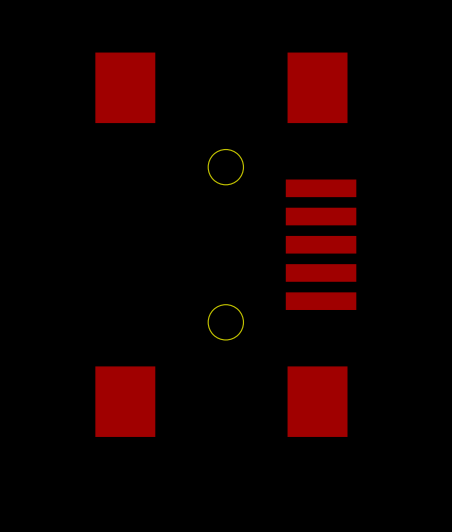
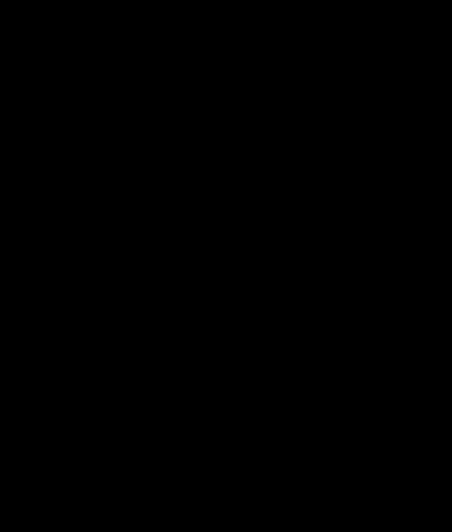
part: (225, 244) -> none

